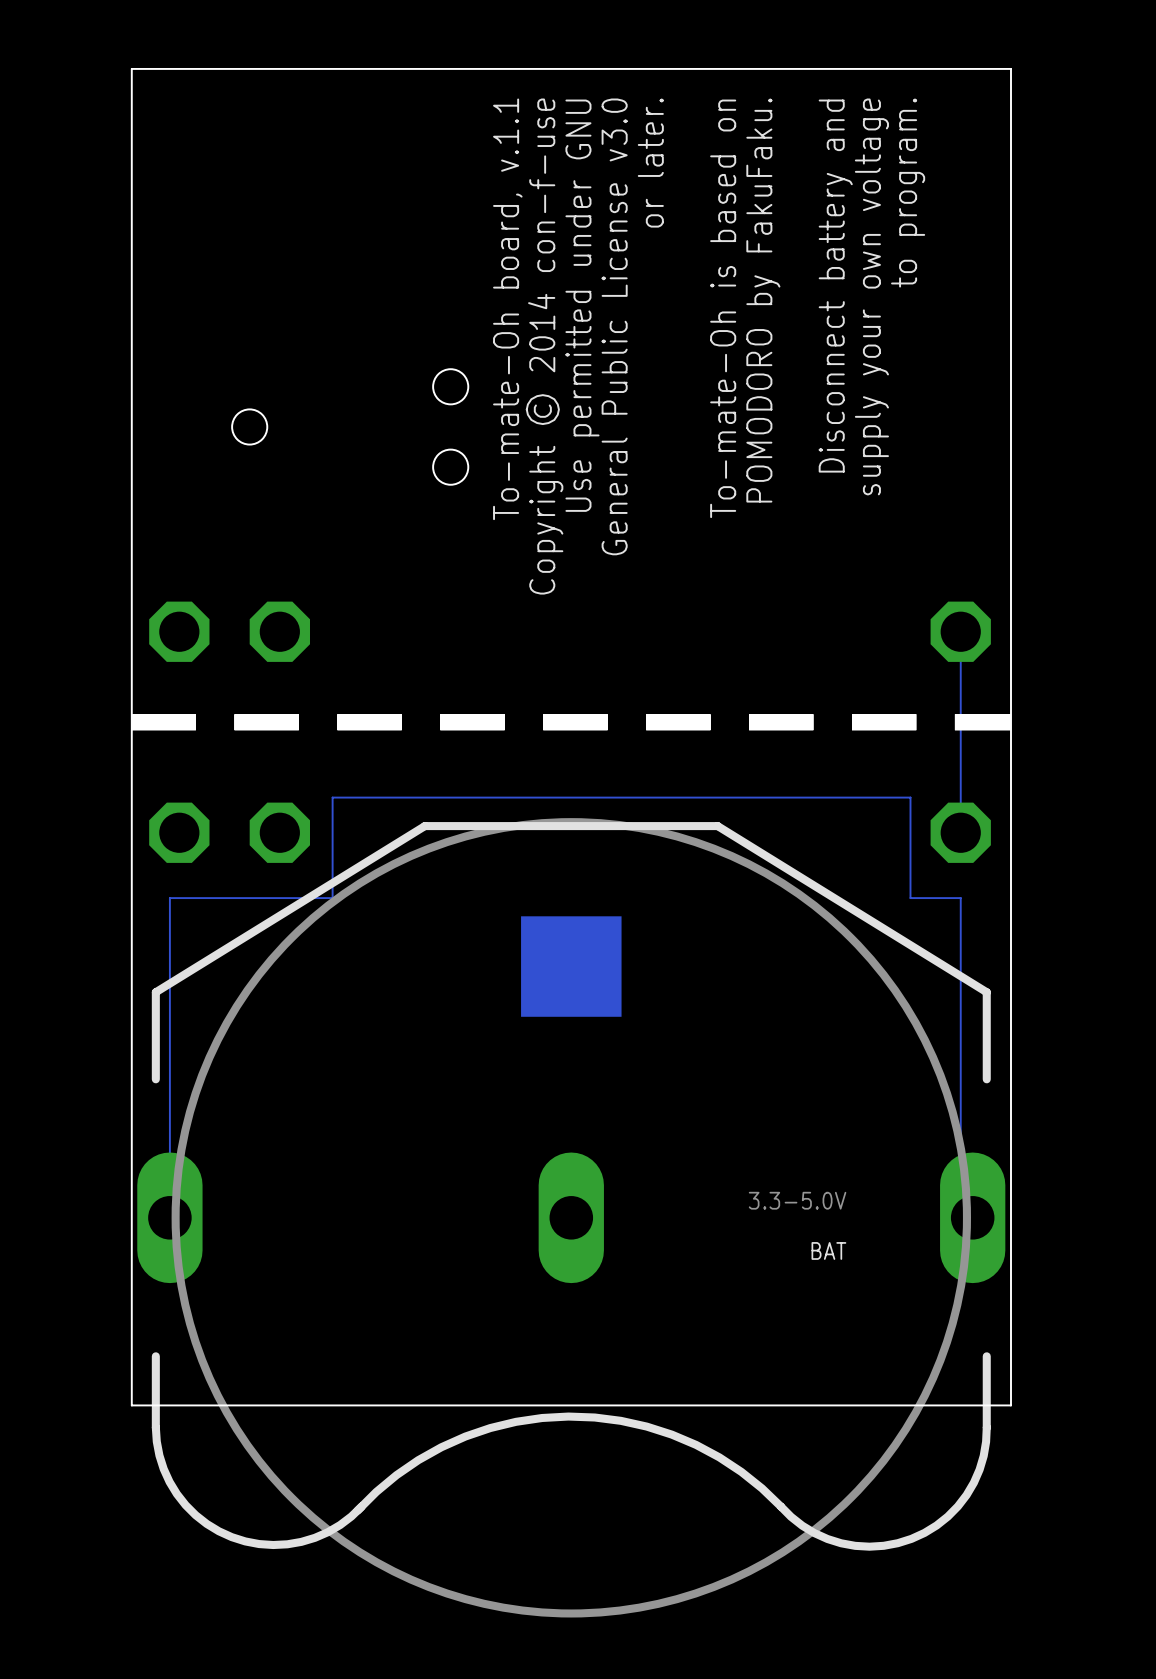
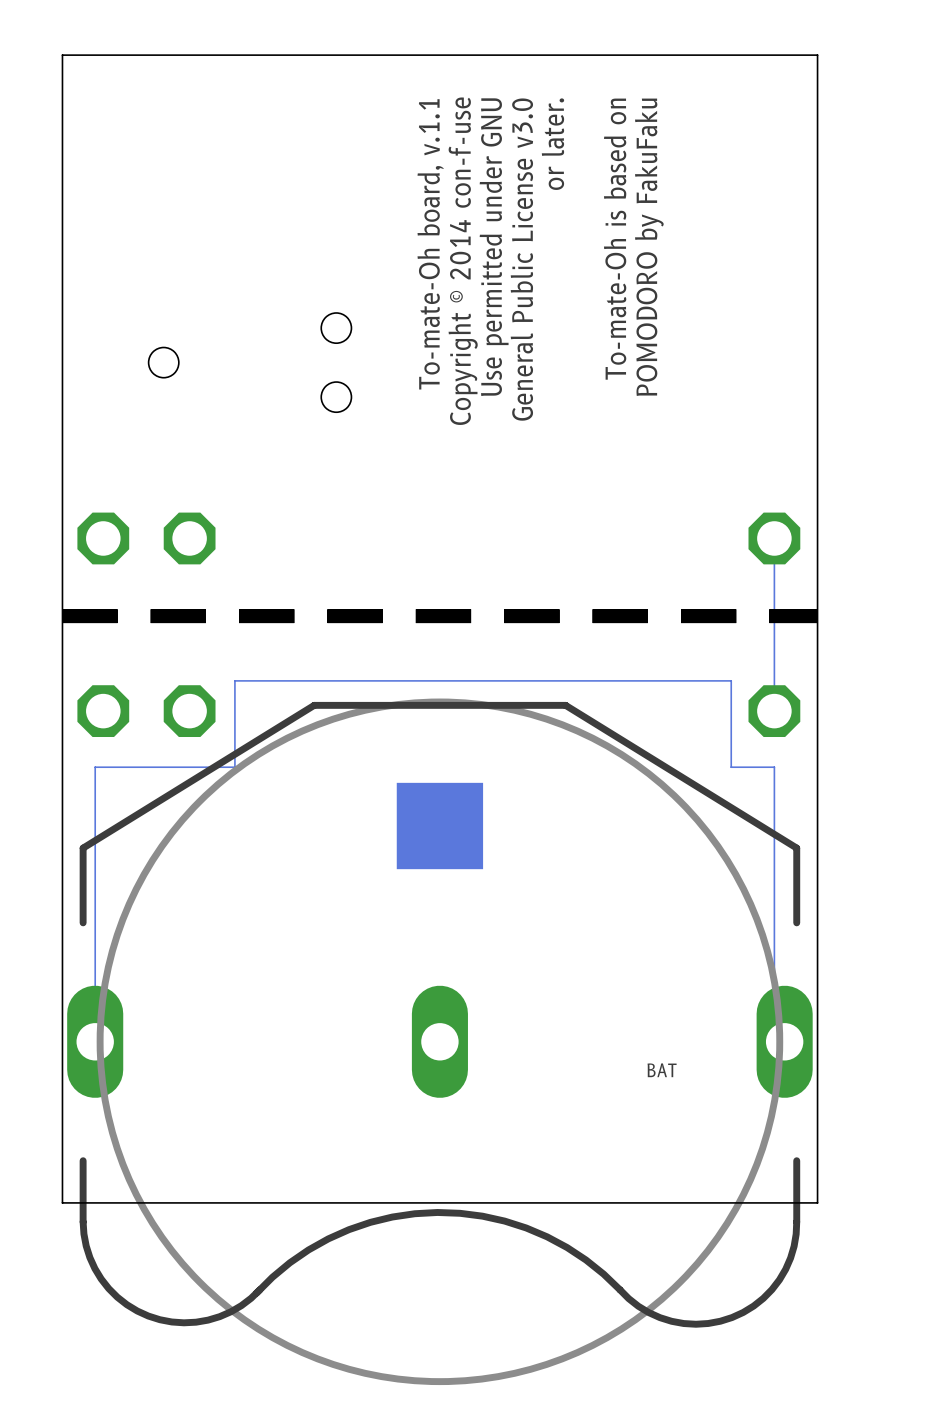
text position: or later. (650, 163) -> or later. (552, 144)
text: to program. (908, 193) -> none
text: Disconnect battery and (835, 286) -> none
text: supply your own voltage (871, 296) -> none
text: POMODORO by FakuFaku. (763, 300) -> To-mate-Oh is based on (615, 239)
text position: Use permitted under GNU (582, 305) -> Use permitted under GNU (494, 247)
text: To-mate-Oh is based on (723, 308) -> none
text position: To-mate-Oh board, v.1.1 (507, 309) -> To-mate-Oh board, v.1.1 (430, 244)
text: none -> POMODORO by FakuFaku (649, 247)
text position: General Public License v3.0 (614, 326) -> General Public License v3.0 (521, 259)
text position: Copyright © 2014 con-f-use (544, 346) -> Copyright © 2014 con-f-use (463, 261)
BAT value: 3.3-5.0V (797, 1200) -> none

